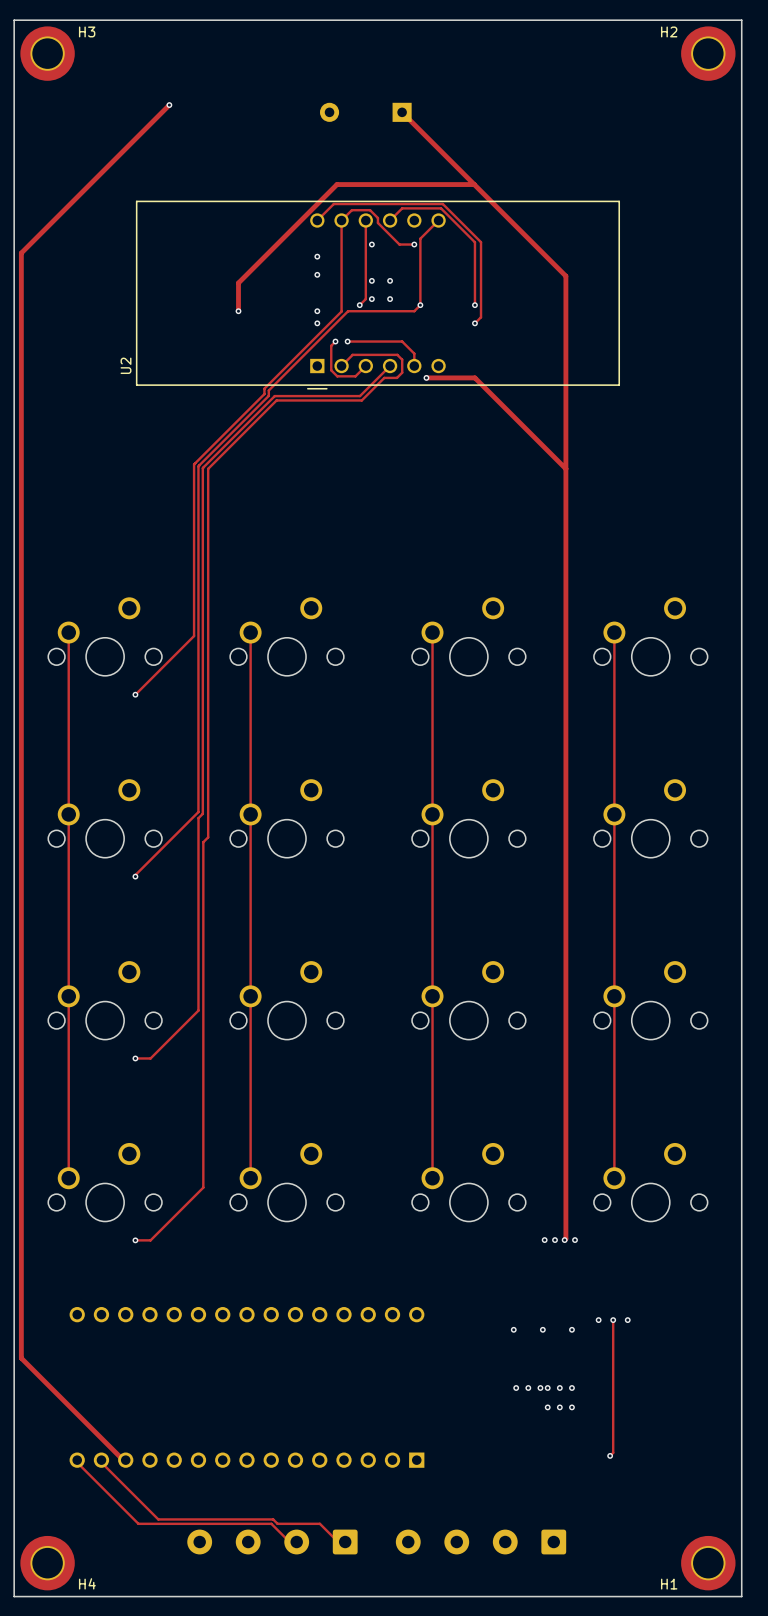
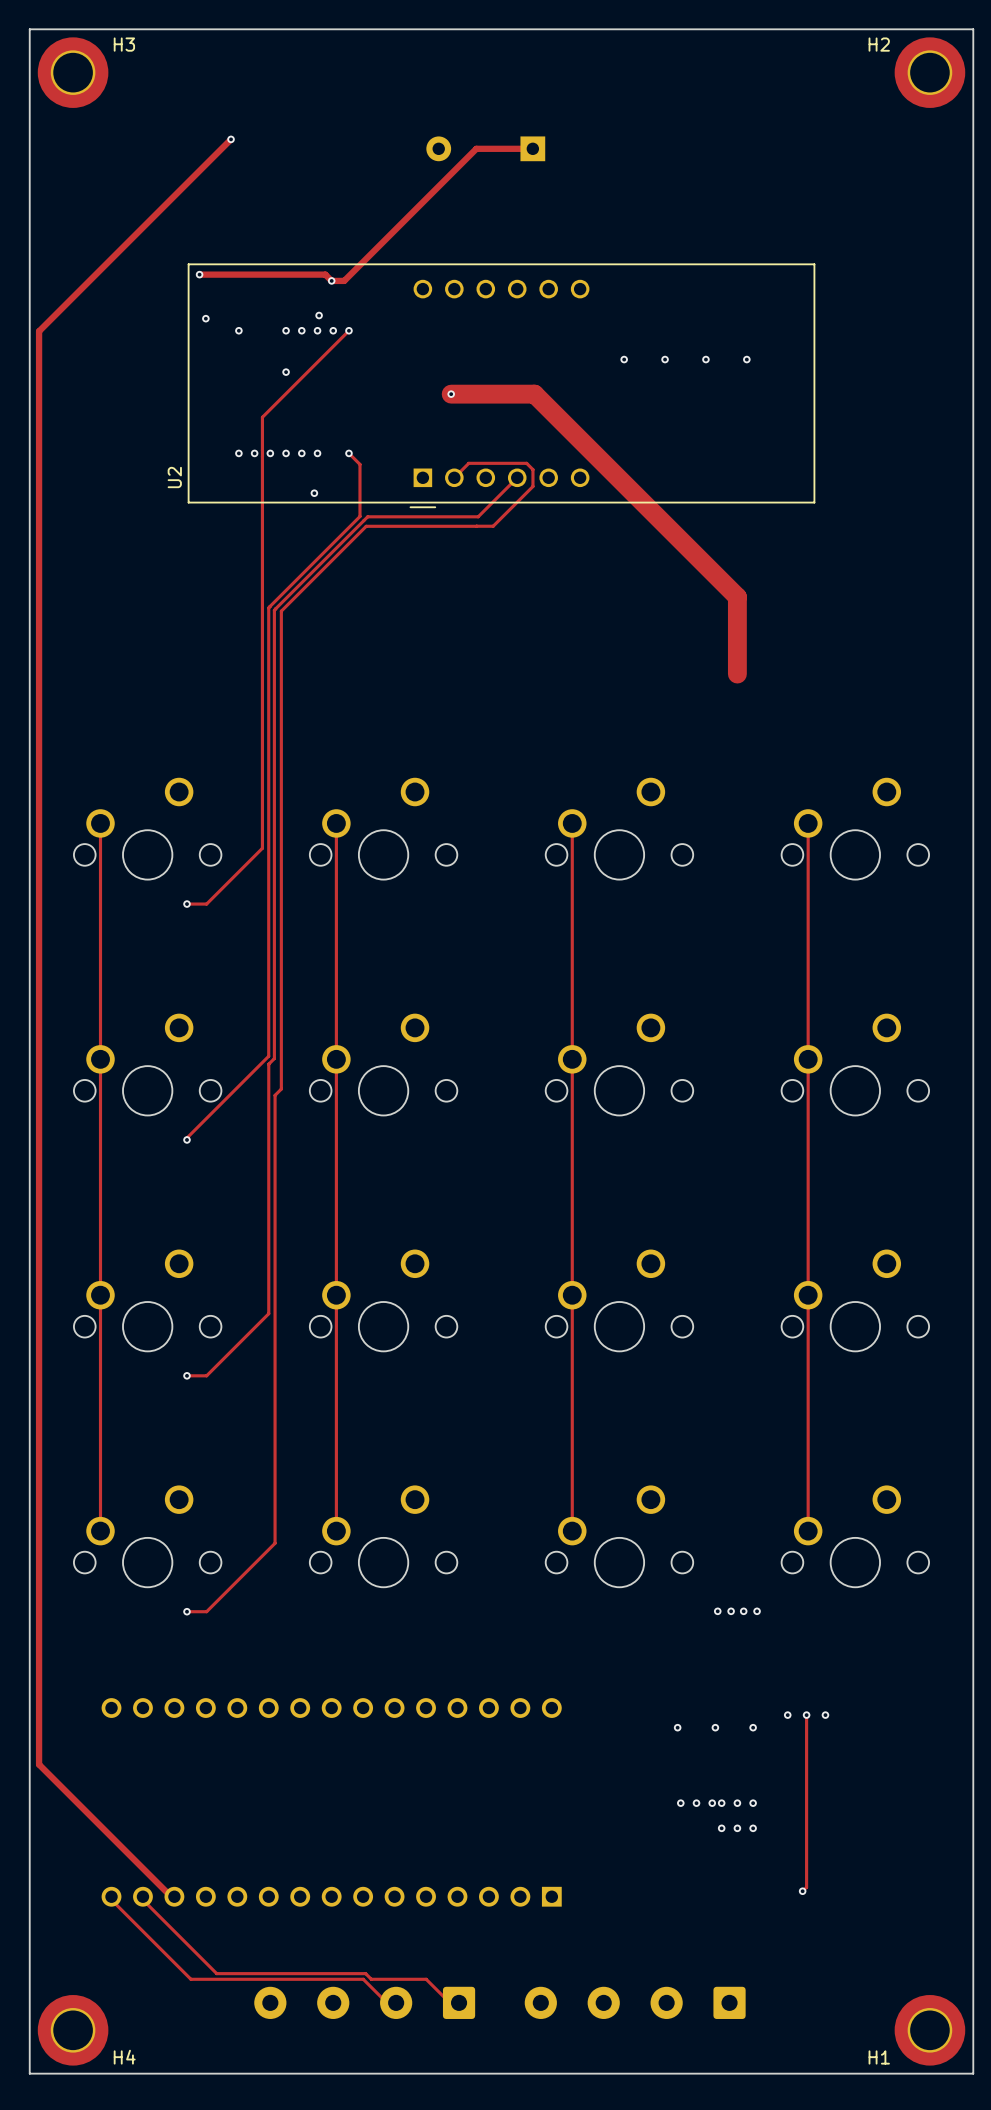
track: (402, 112) (565, 276) (564, 1240) -> (532, 148) (476, 148) (344, 280) (331, 280) (325, 274) (199, 274)
track: (474, 184) (336, 184) (238, 283) (238, 311) -> none
via: none -> (199, 274)
via: none -> (331, 280)
track: (317, 220) (333, 204) (442, 204) (481, 242) (481, 317) (474, 323) -> none
track: (365, 220) (365, 299) (359, 305) -> none
track: (390, 220) (402, 208) (441, 208) (474, 242) (474, 305) -> none
track: (438, 220) (420, 238) (420, 305) (414, 311) (348, 311) (268, 390) -> (348, 453) (359, 464) (359, 509)
via: none -> (319, 315)
via: none -> (205, 318)
via: (371, 244) -> none
track: (414, 244) (399, 244) (377, 222) (377, 218) (370, 210) (351, 210) (341, 220) (341, 311) (264, 388) (264, 394) (195, 463) -> none
via: (414, 244) -> none
via: none -> (238, 330)
via: none -> (286, 330)
via: none -> (301, 330)
via: none -> (317, 330)
via: none -> (333, 330)
track: none -> (348, 330) (262, 417) (262, 450)
via: none -> (348, 330)
via: (317, 256) -> none
via: (317, 274) -> none
via: none -> (624, 359)
via: none -> (665, 359)
via: none -> (705, 359)
via: none -> (746, 359)
via: (371, 280) -> none
via: (390, 280) -> none
via: none -> (286, 372)
via: (371, 299) -> none
via: (390, 299) -> none
track: none -> (451, 394) (534, 394) (737, 597) (737, 674)
via: none -> (451, 394)
via: (359, 305) -> none
via: (420, 305) -> none
via: (474, 305) -> none
via: (238, 311) -> none
via: (317, 311) -> none
via: (317, 323) -> none
via: (474, 323) -> none
track: (335, 341) (331, 345) (331, 370) (337, 376) (355, 376) (365, 366) -> none
via: (335, 341) -> none
track: (347, 341) (402, 341) (414, 353) (414, 366) -> none
via: (347, 341) -> none
track: none -> (262, 450) (262, 456)
via: none -> (238, 453)
via: none -> (254, 453)
via: none -> (270, 453)
via: none -> (286, 453)
via: none -> (301, 453)
via: none -> (317, 453)
via: none -> (348, 453)
via: none -> (314, 493)
track: (397, 377) (384, 377) (361, 400) (276, 400) (273, 403) -> (476, 526) (366, 526)
track: none -> (526, 493) (493, 526) (476, 526)
track: (426, 377) (474, 377) (565, 468) -> none
via: (426, 377) -> none
track: (195, 463) (194, 636) (135, 694) -> (262, 456) (262, 848) (206, 904) (187, 904)

